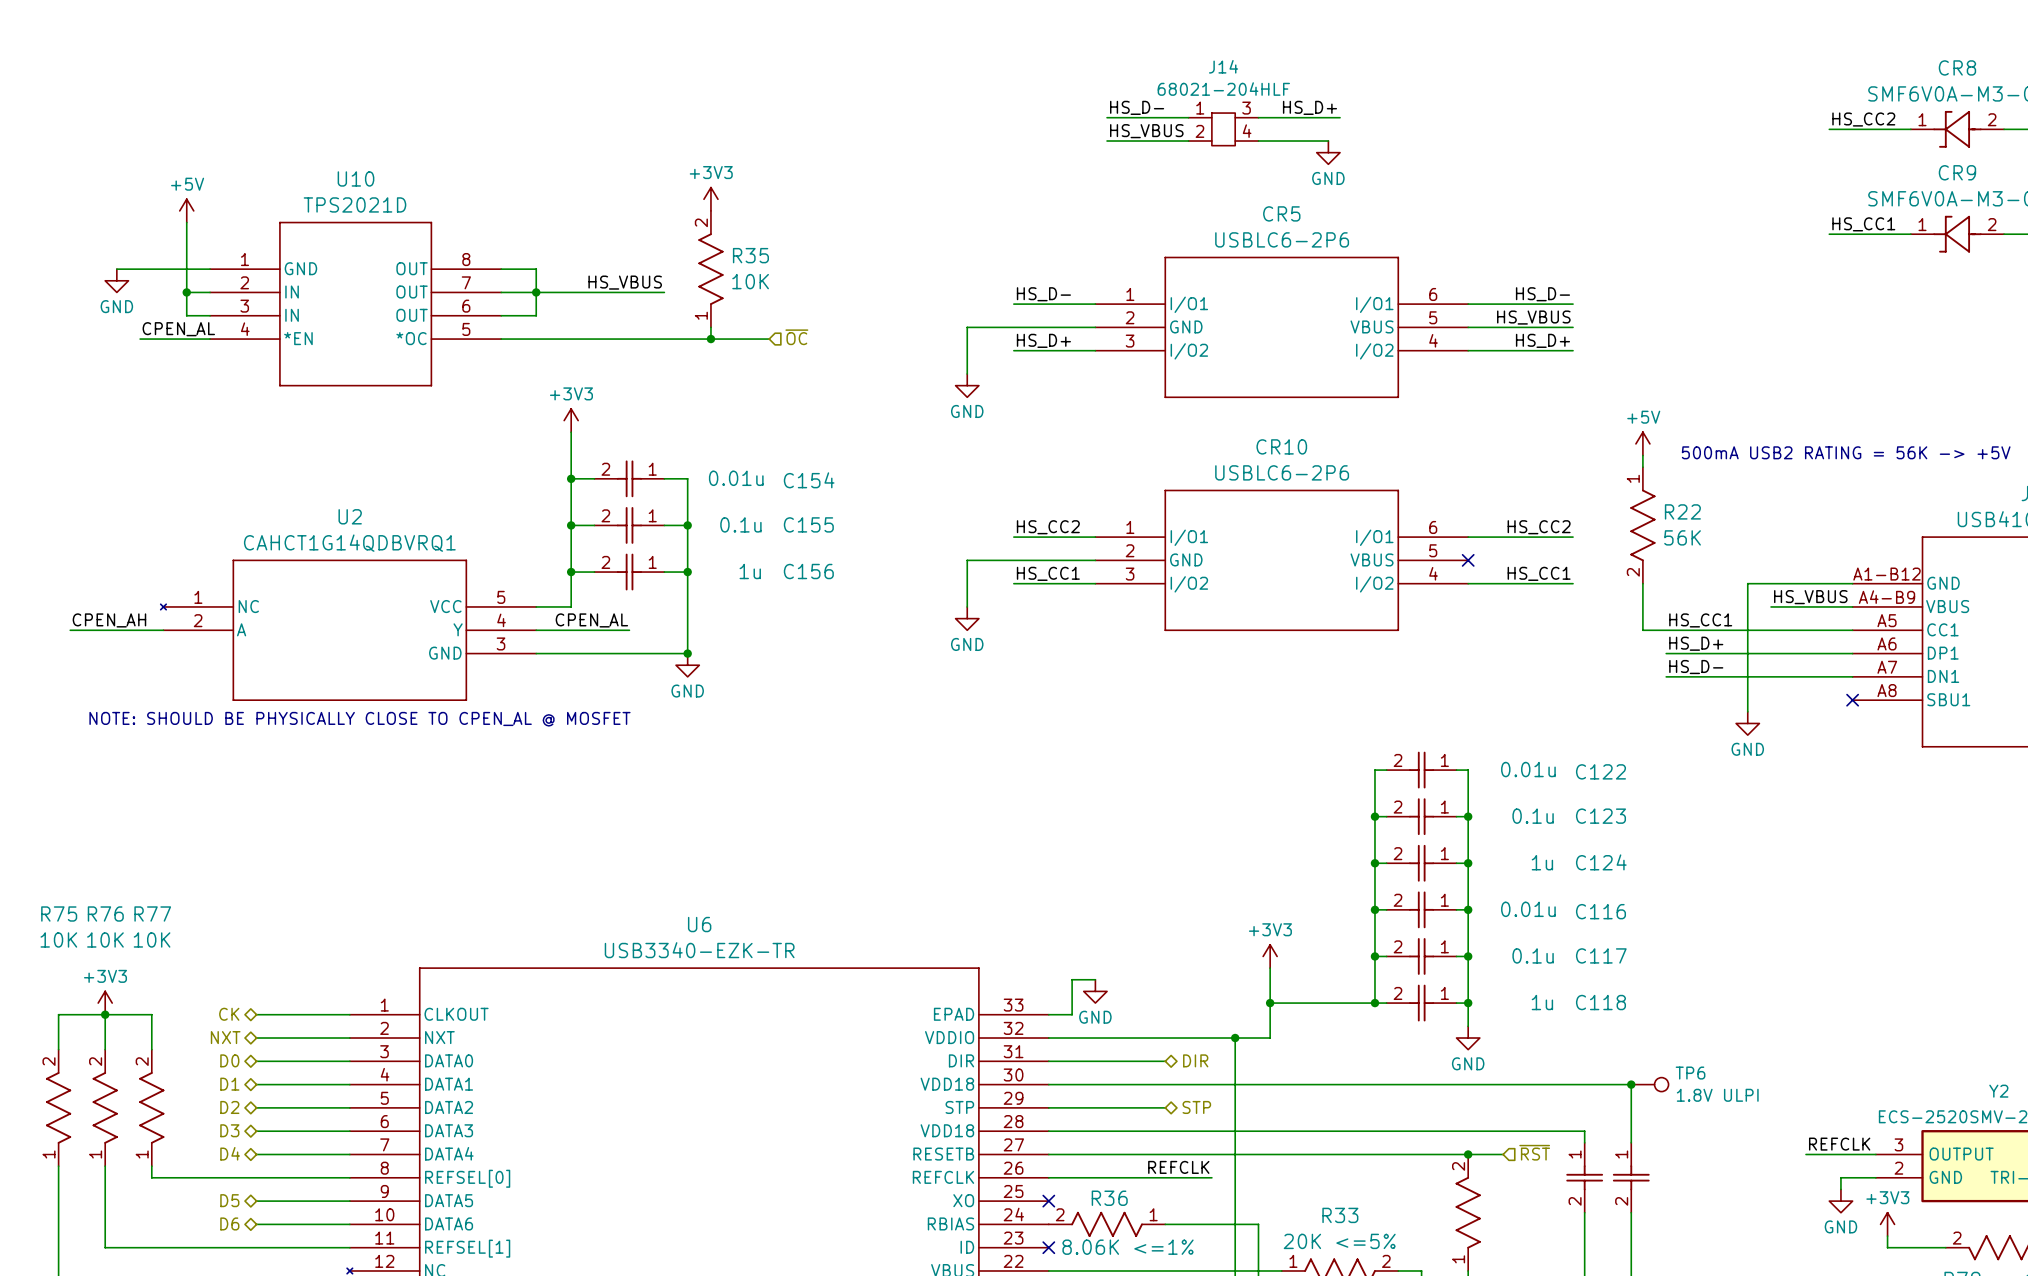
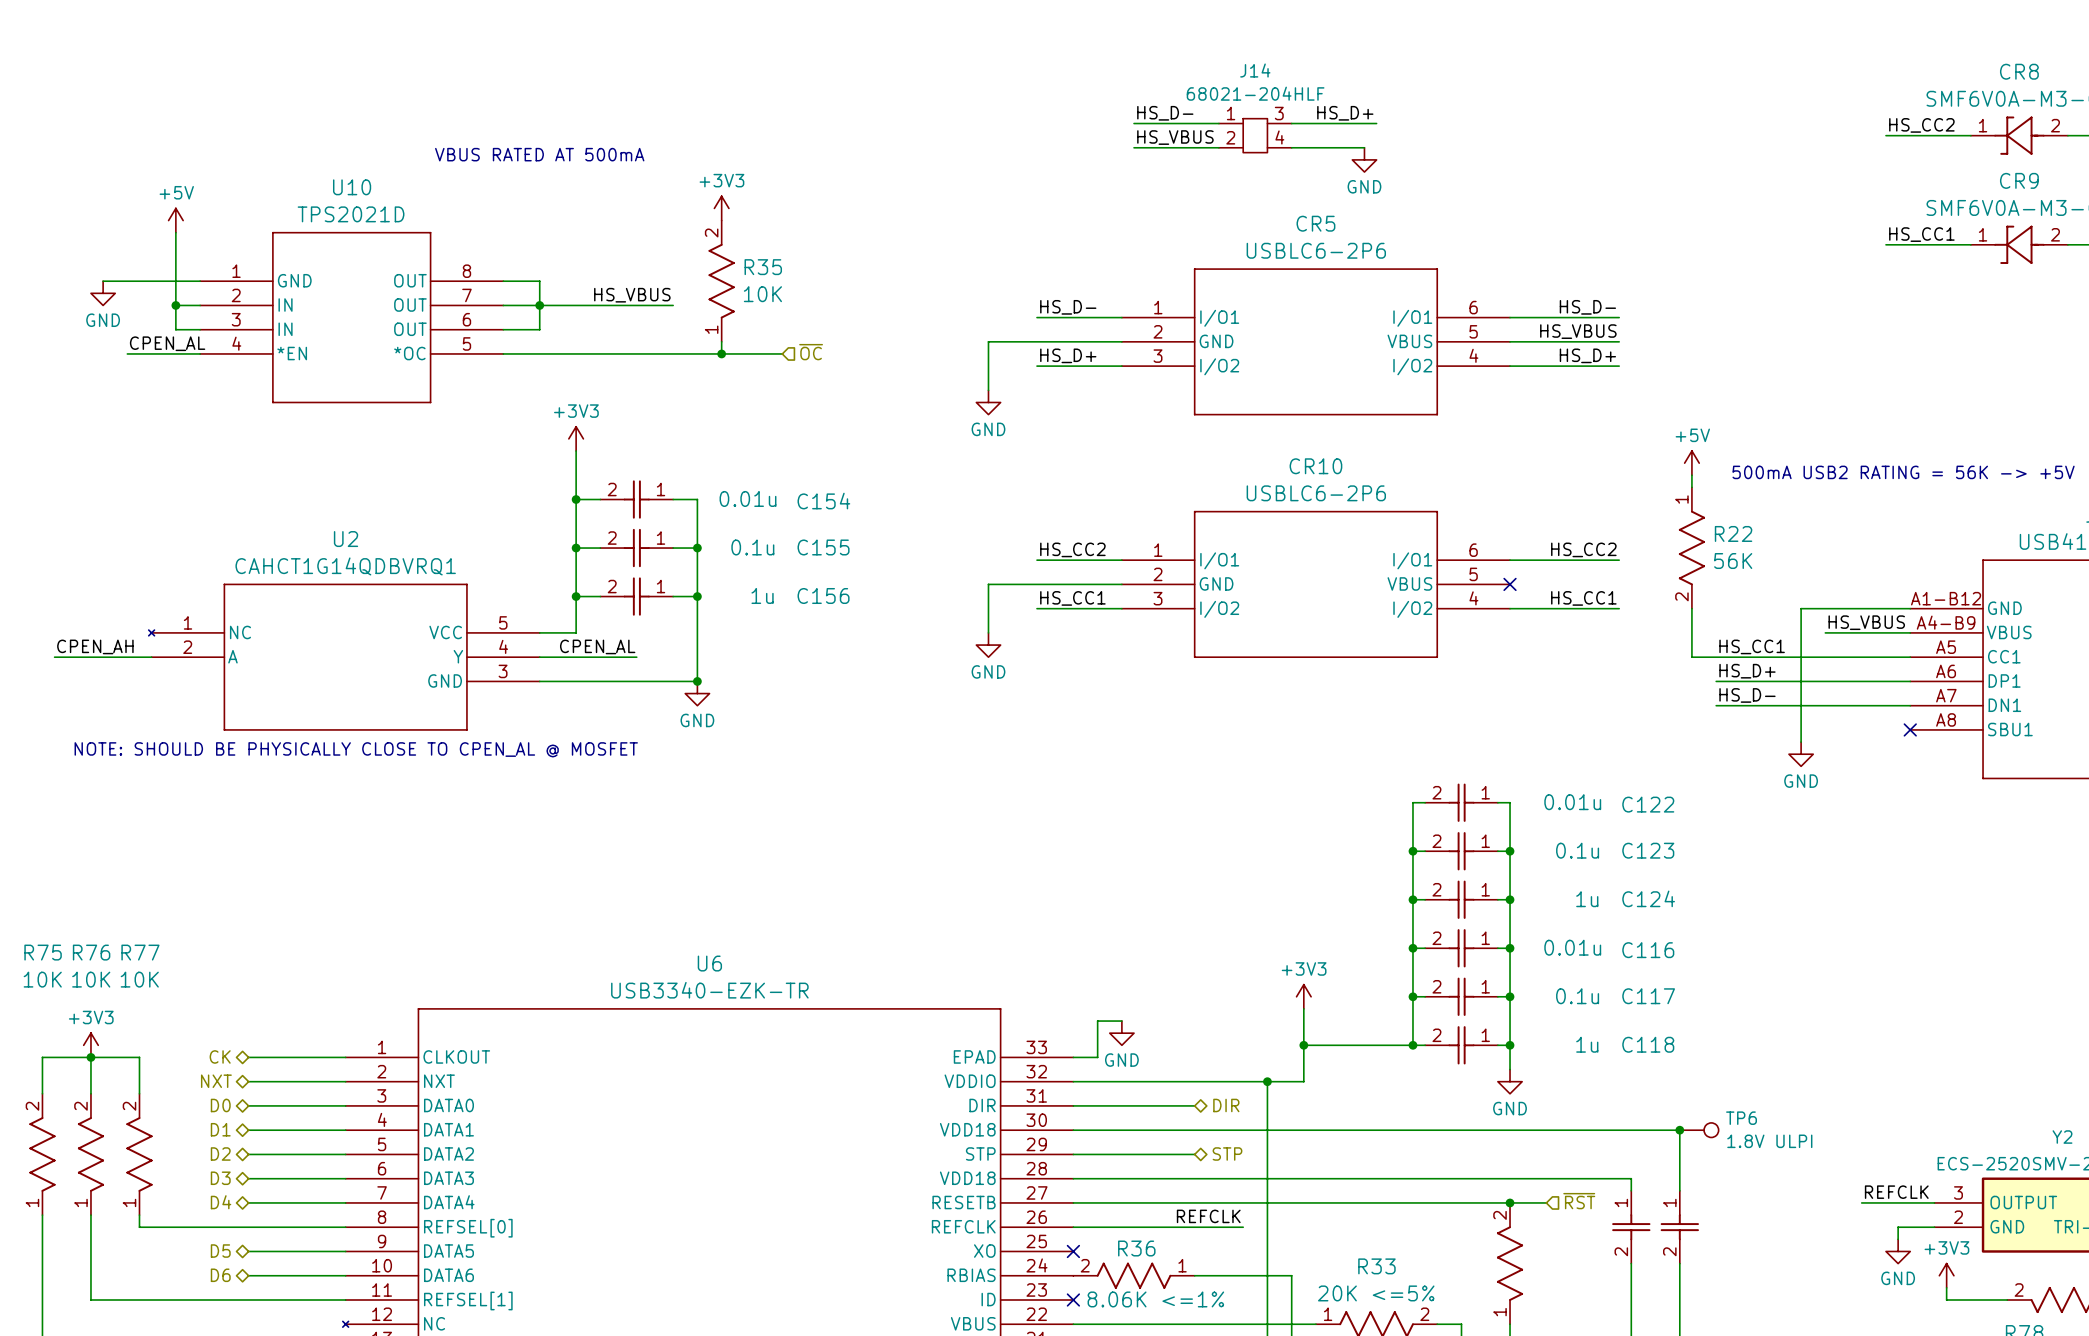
text: none -> VBUS RATED AT 500mA (539, 154)

